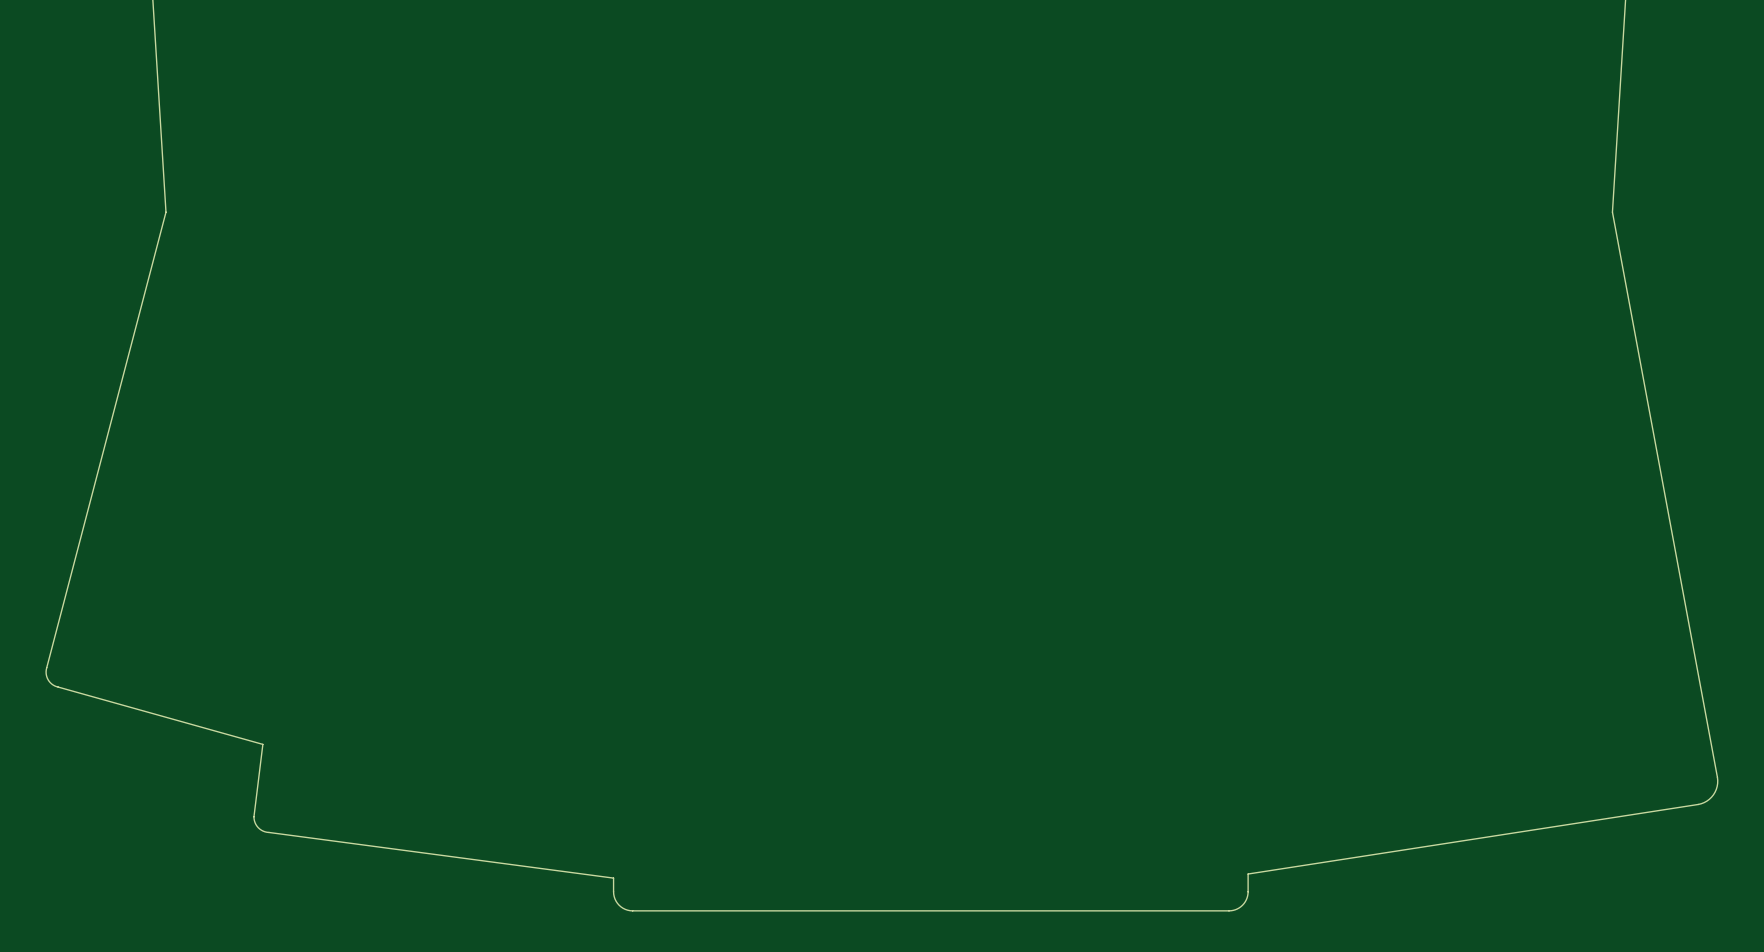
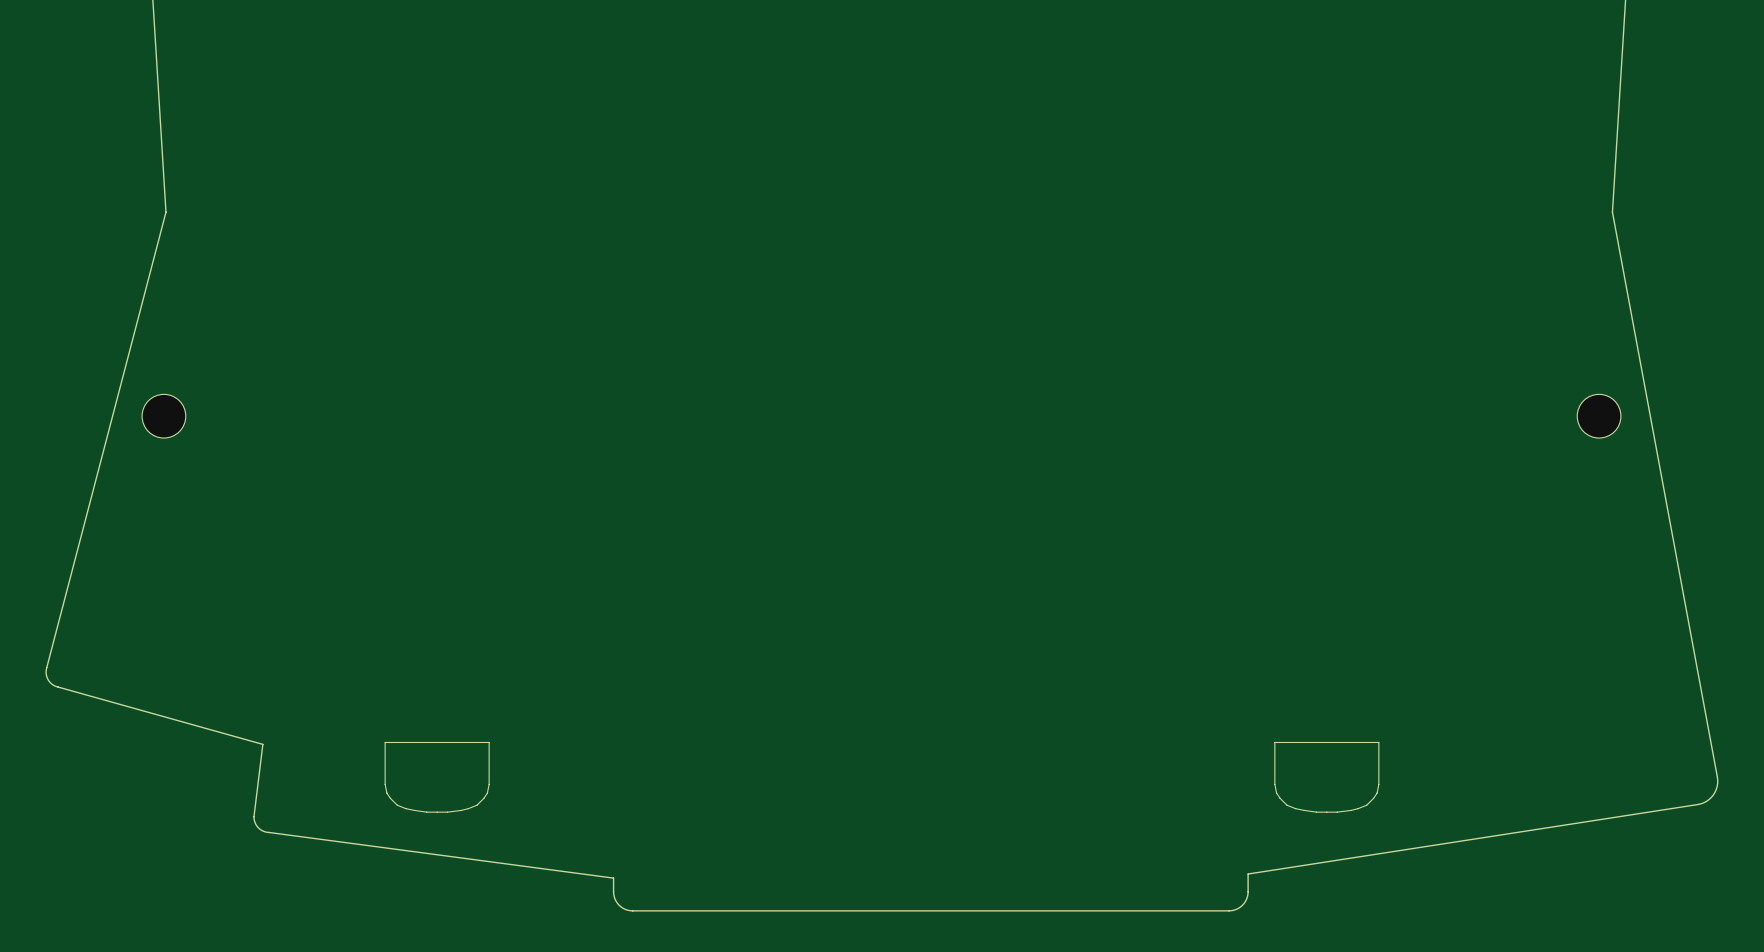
part: none -> (163, 416)
part: none -> (1599, 416)
drawing: none -> [384, 742, 490, 813]
drawing: none -> [1274, 742, 1380, 813]

